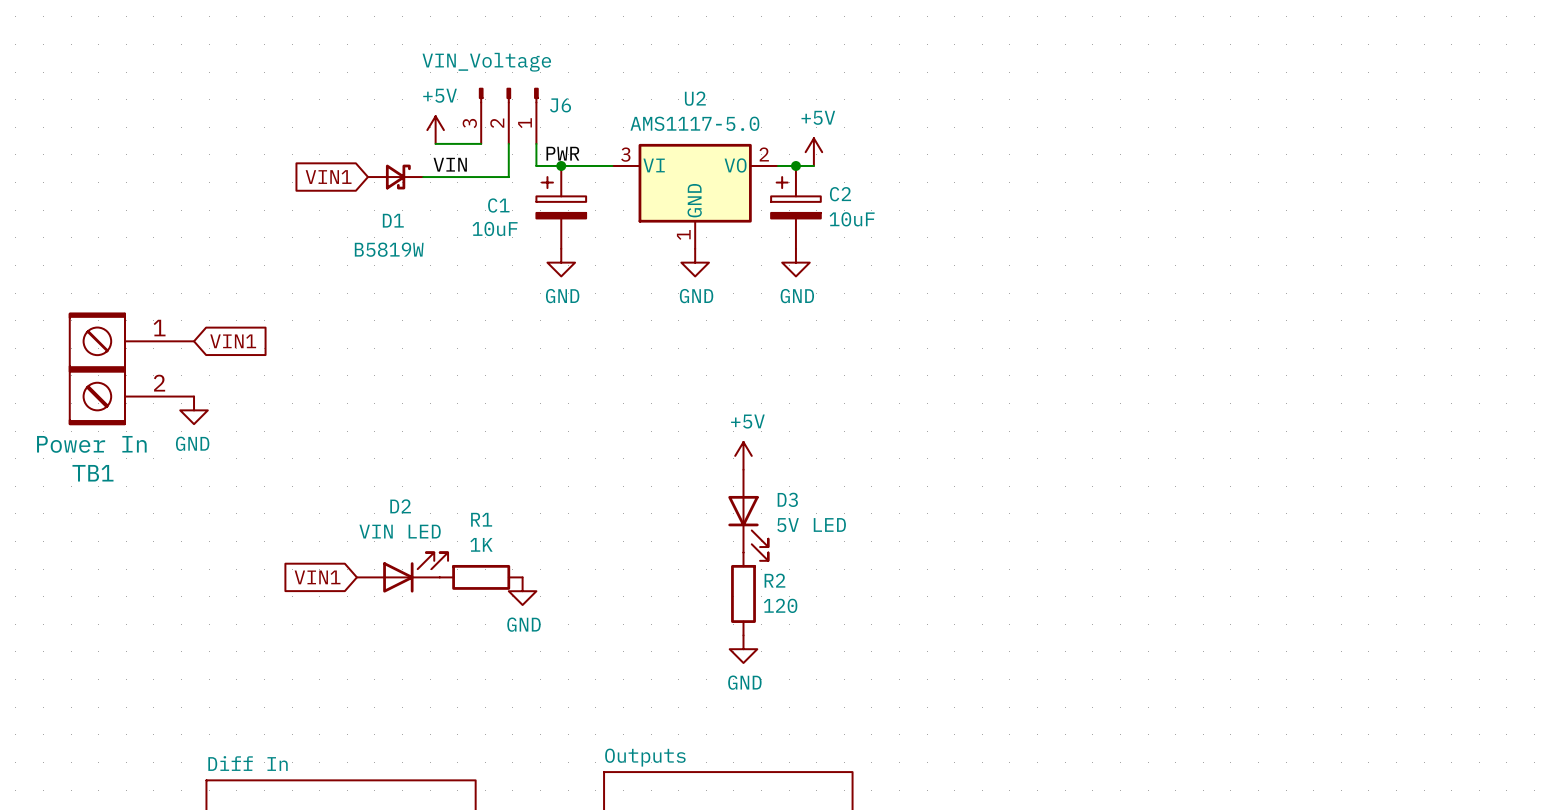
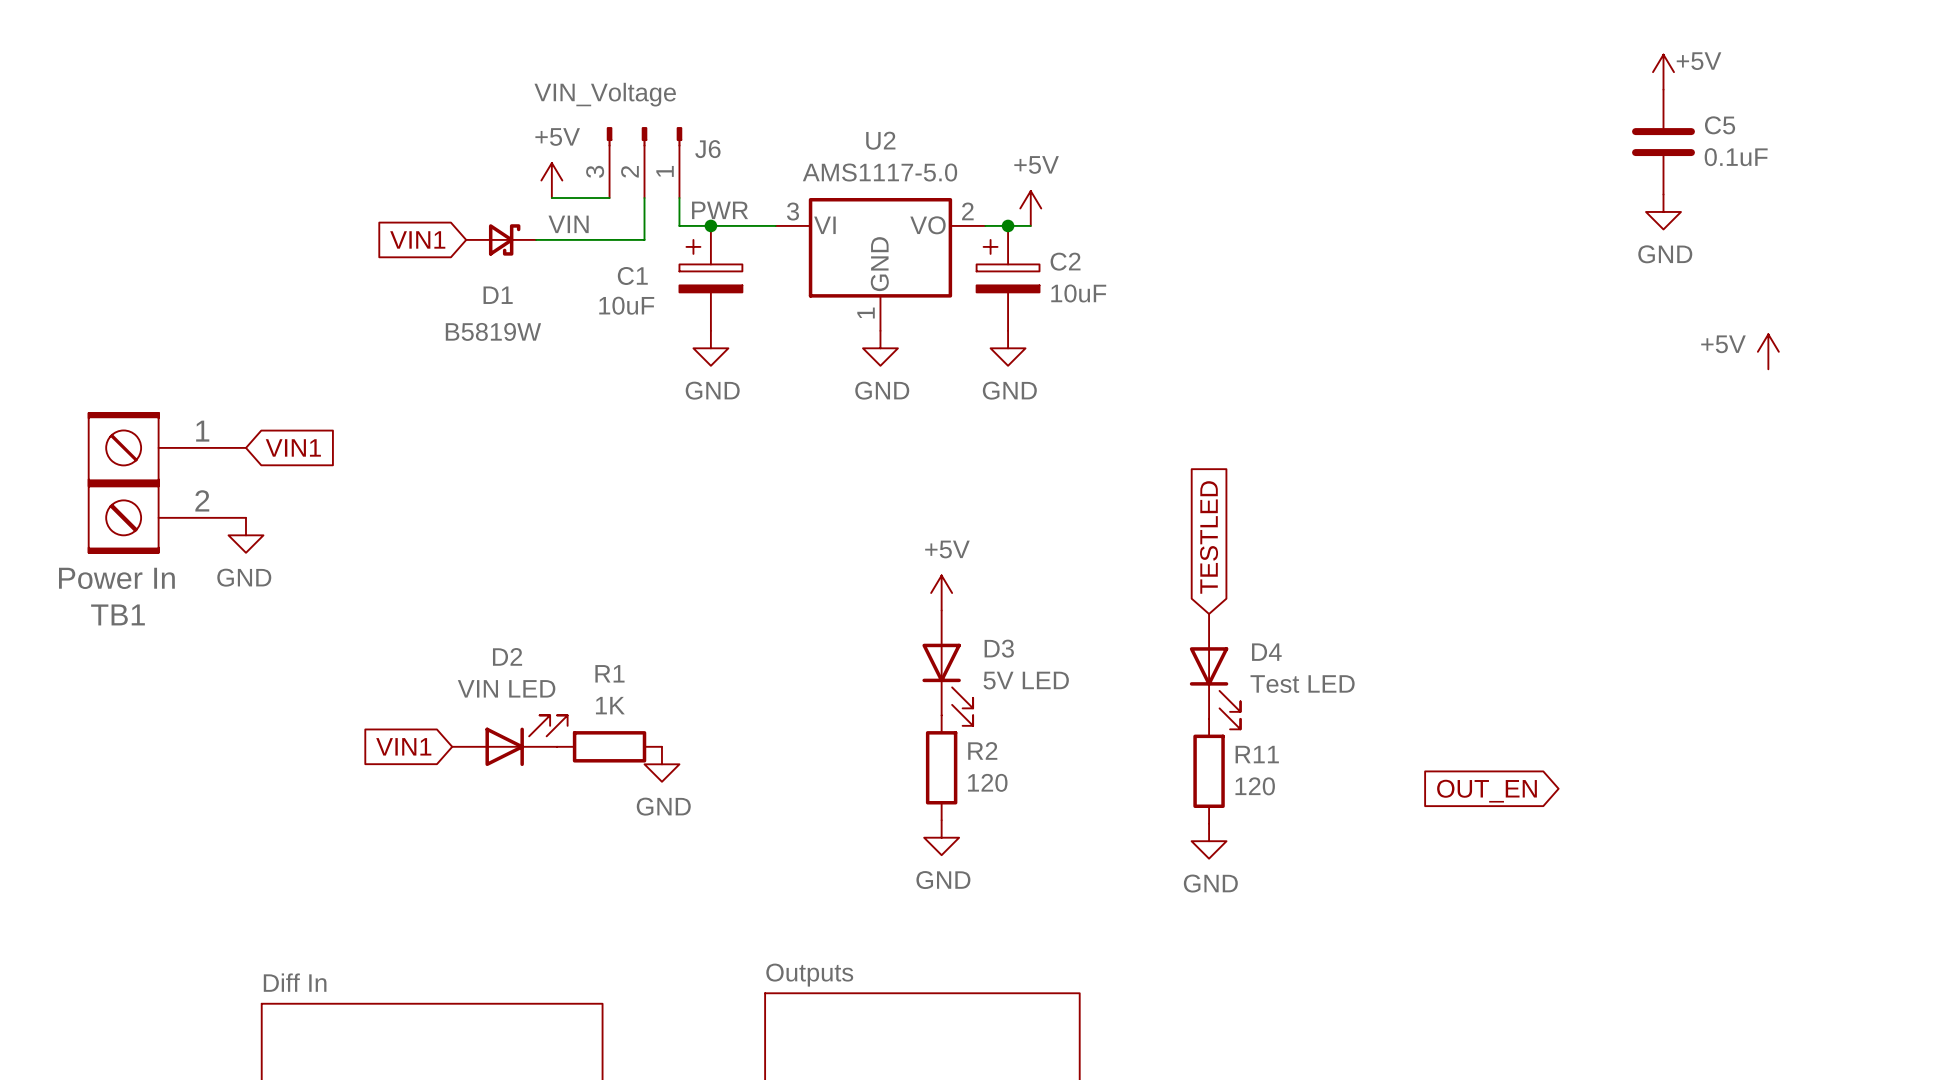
power symbol: none -> +5V (1663, 72)
C5: none -> 0.1uF (1663, 142)
power symbol: none -> GND (1663, 211)
power symbol: none -> +5V (1768, 351)
global label: none -> TESTLED (1209, 537)
D4: none -> Test LED (1215, 671)
R11: none -> 120 (1209, 771)
global label: none -> OUT_EN (1487, 791)
power symbol: none -> GND (1209, 841)

